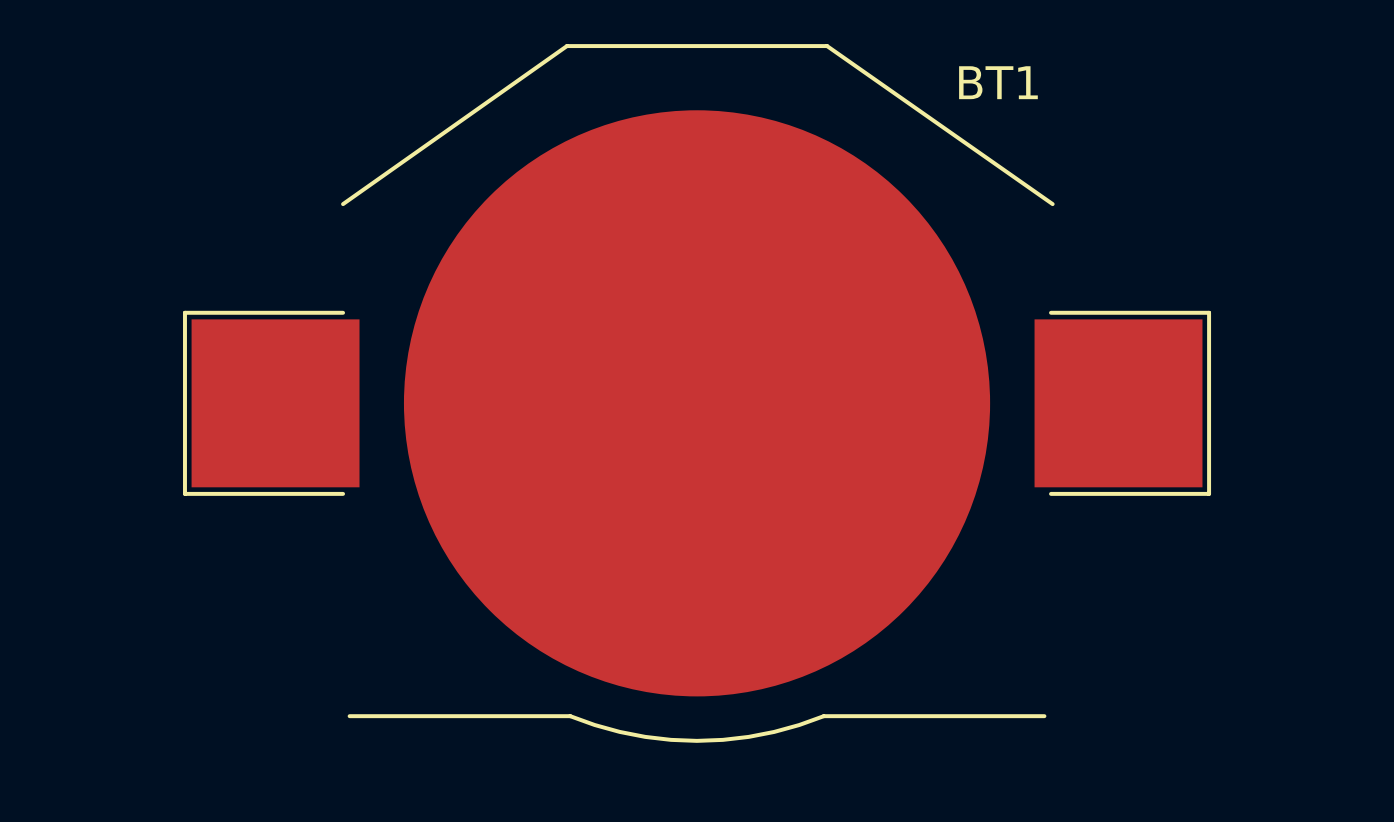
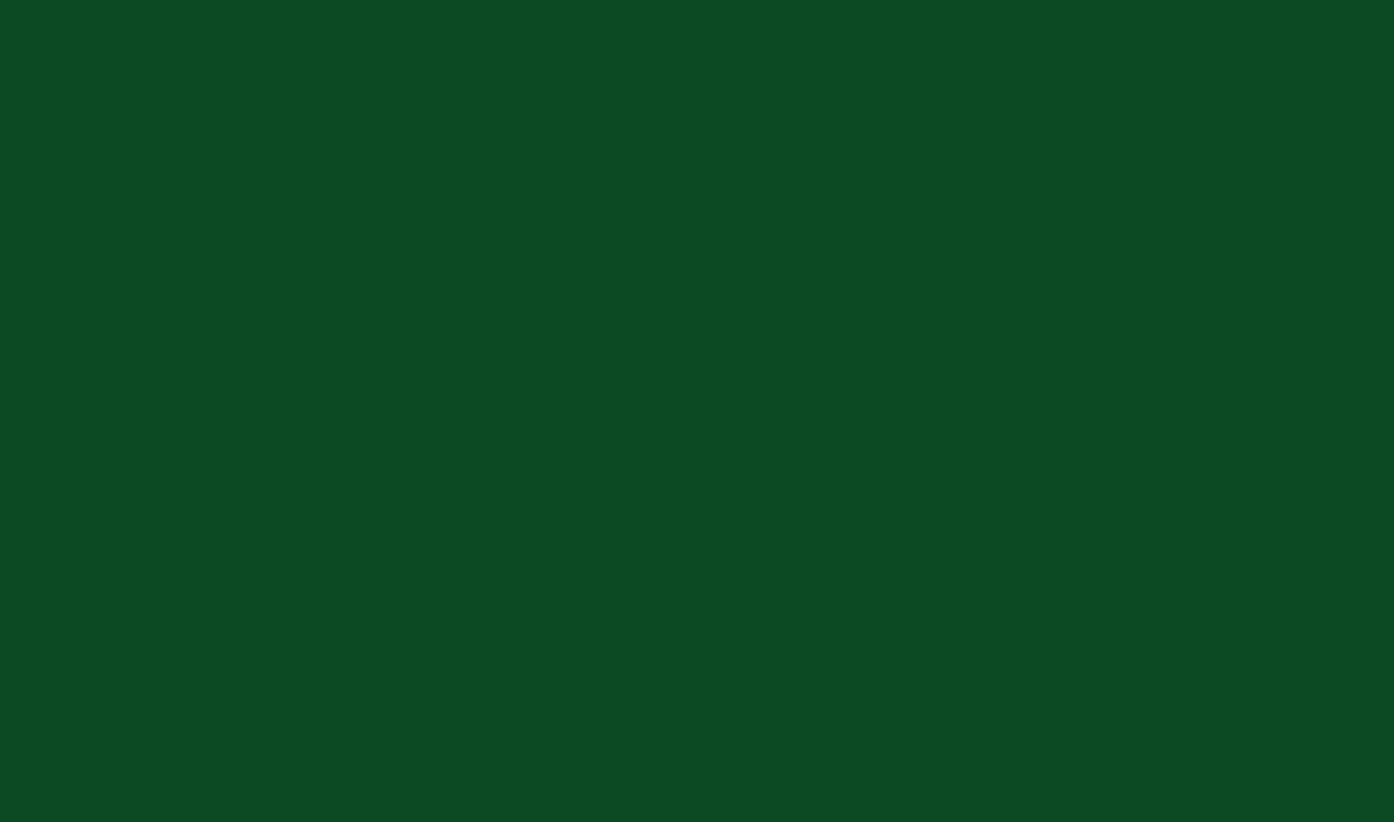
BT1: (697, 393) -> none

